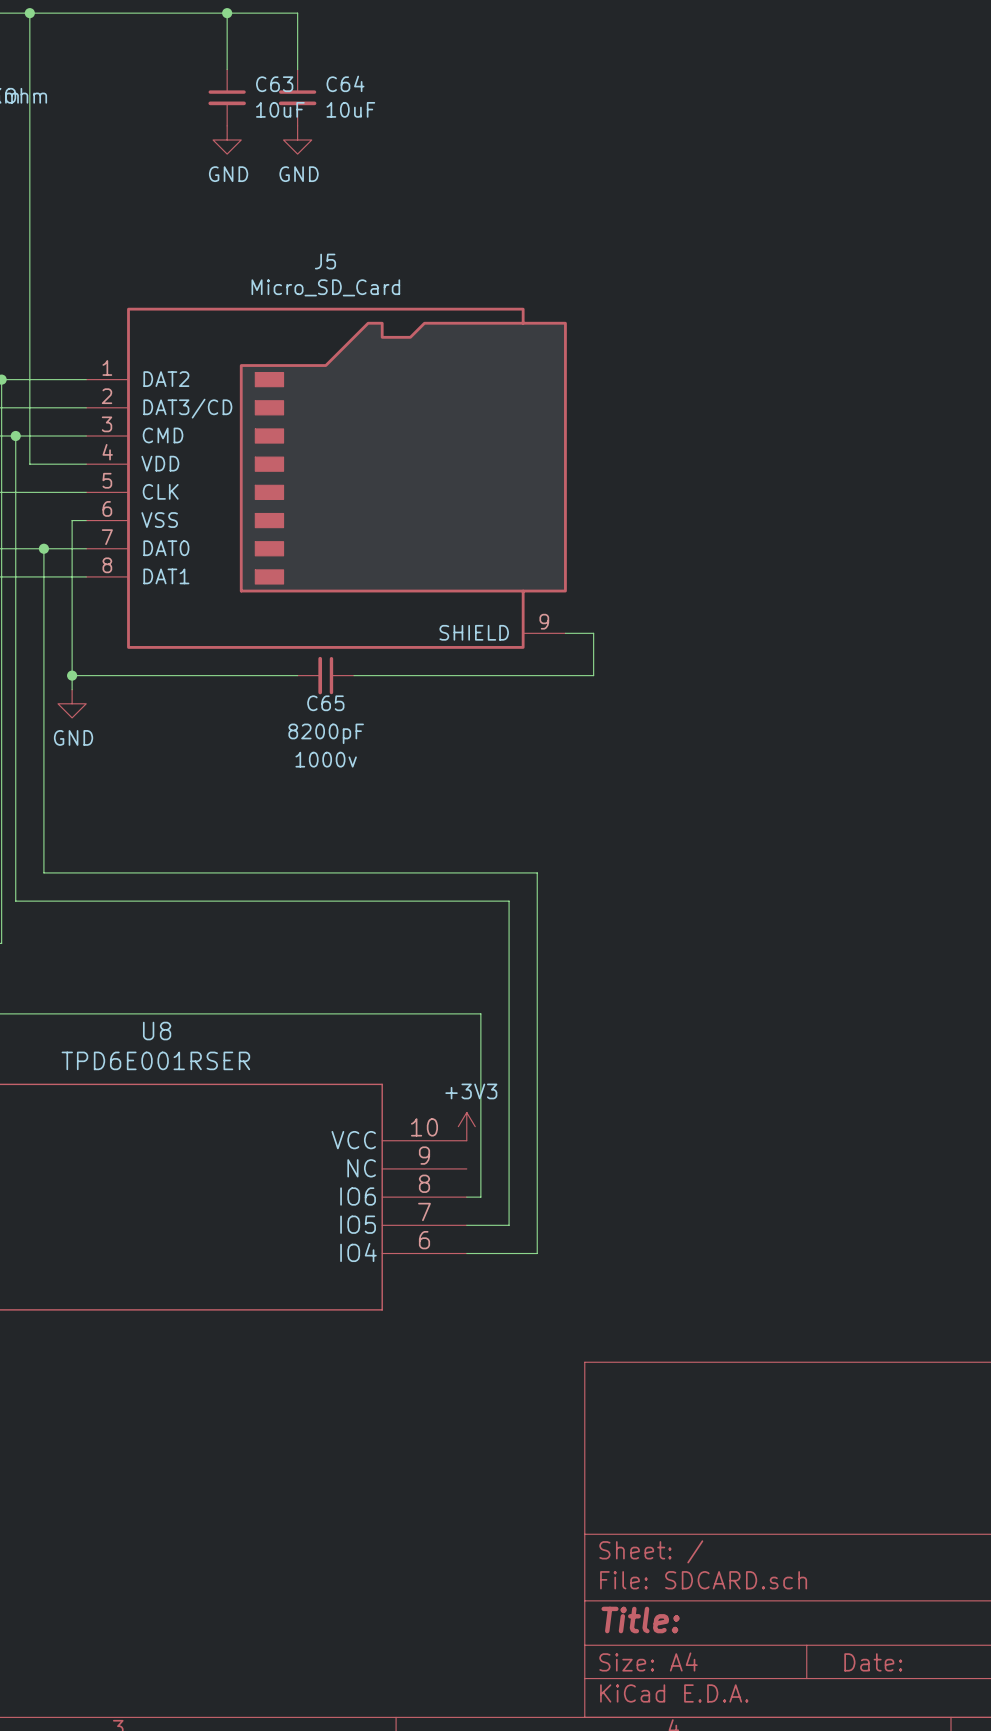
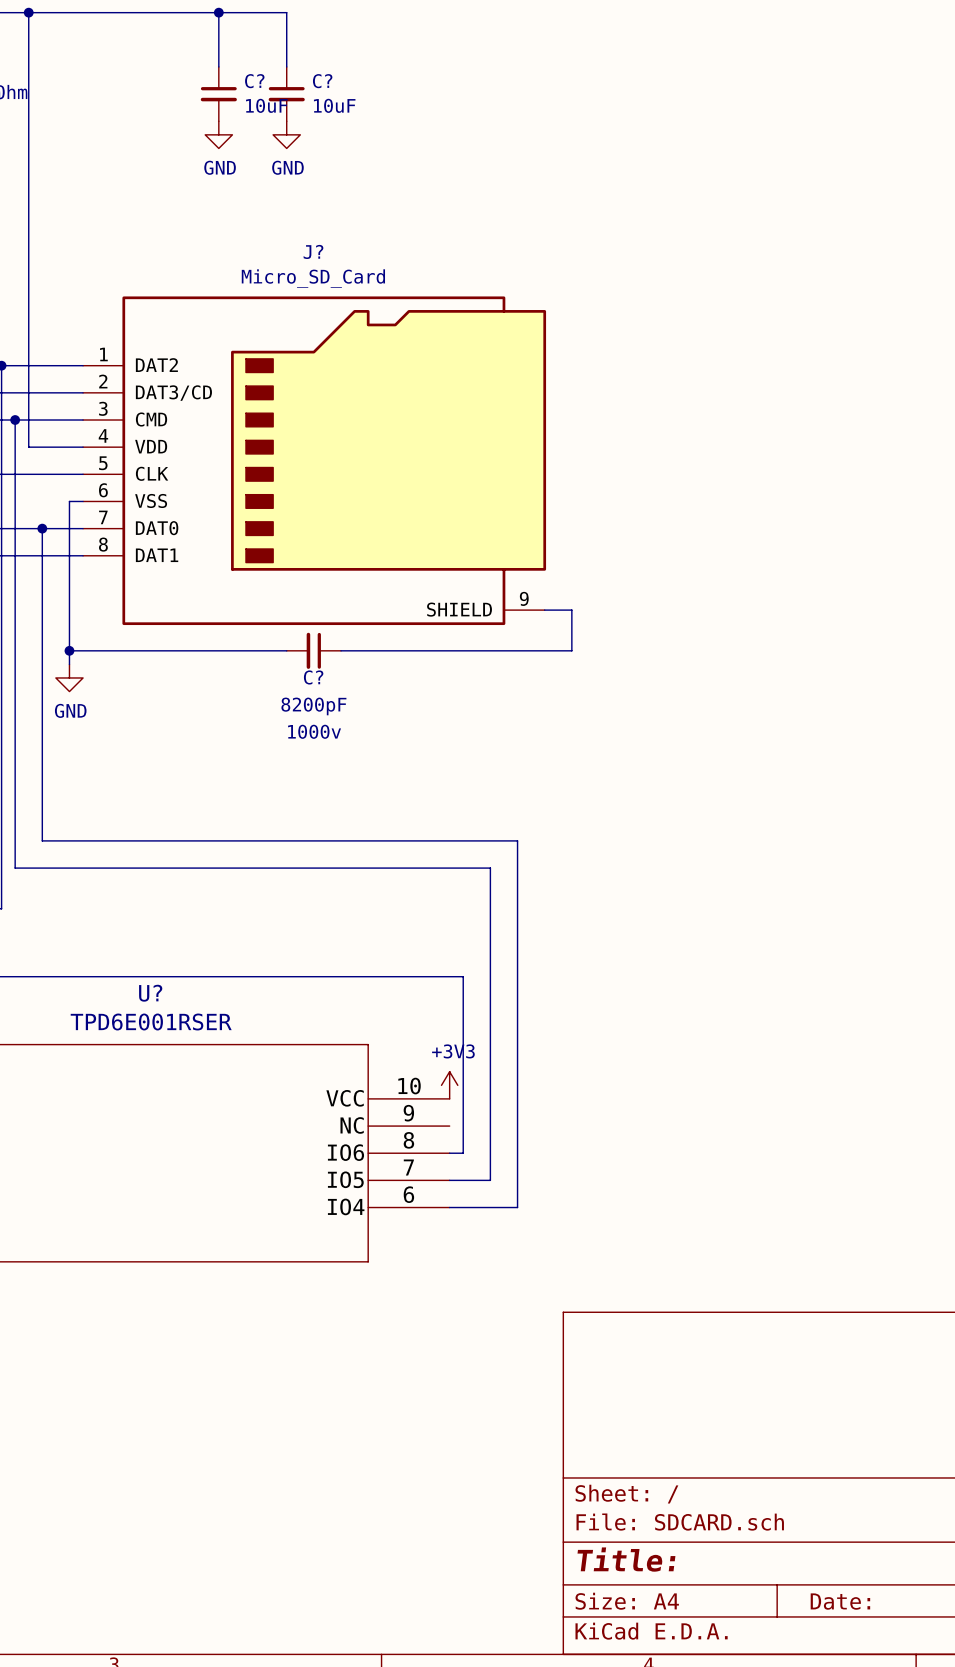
C64 name: C64 (345, 83) -> C? (322, 81)
C63 name: C63 (274, 84) -> C? (254, 81)
J5 name: J5 (325, 261) -> J? (313, 251)
C65 name: C65 (325, 703) -> C? (313, 677)
U8 name: U8 (157, 1031) -> U? (150, 993)

